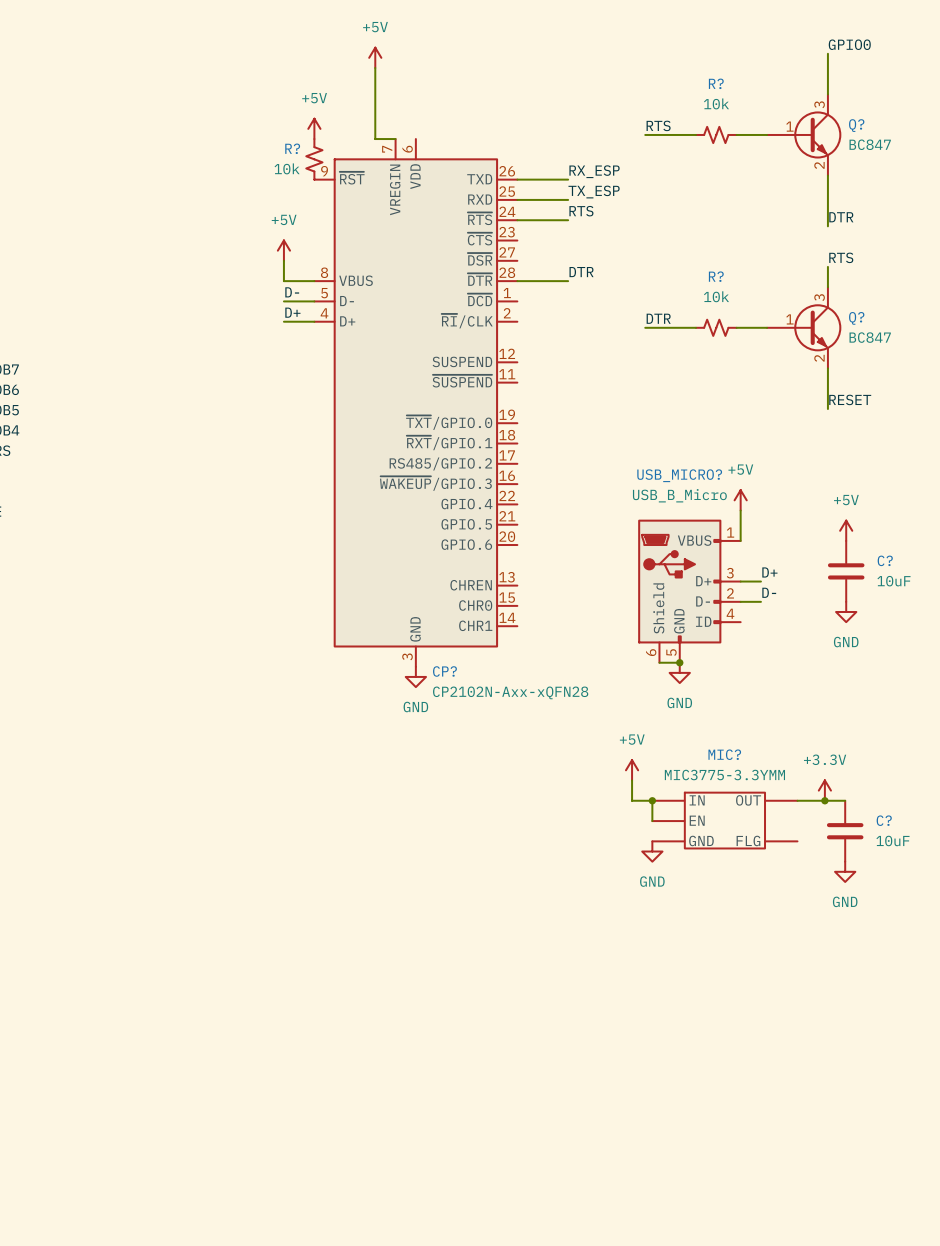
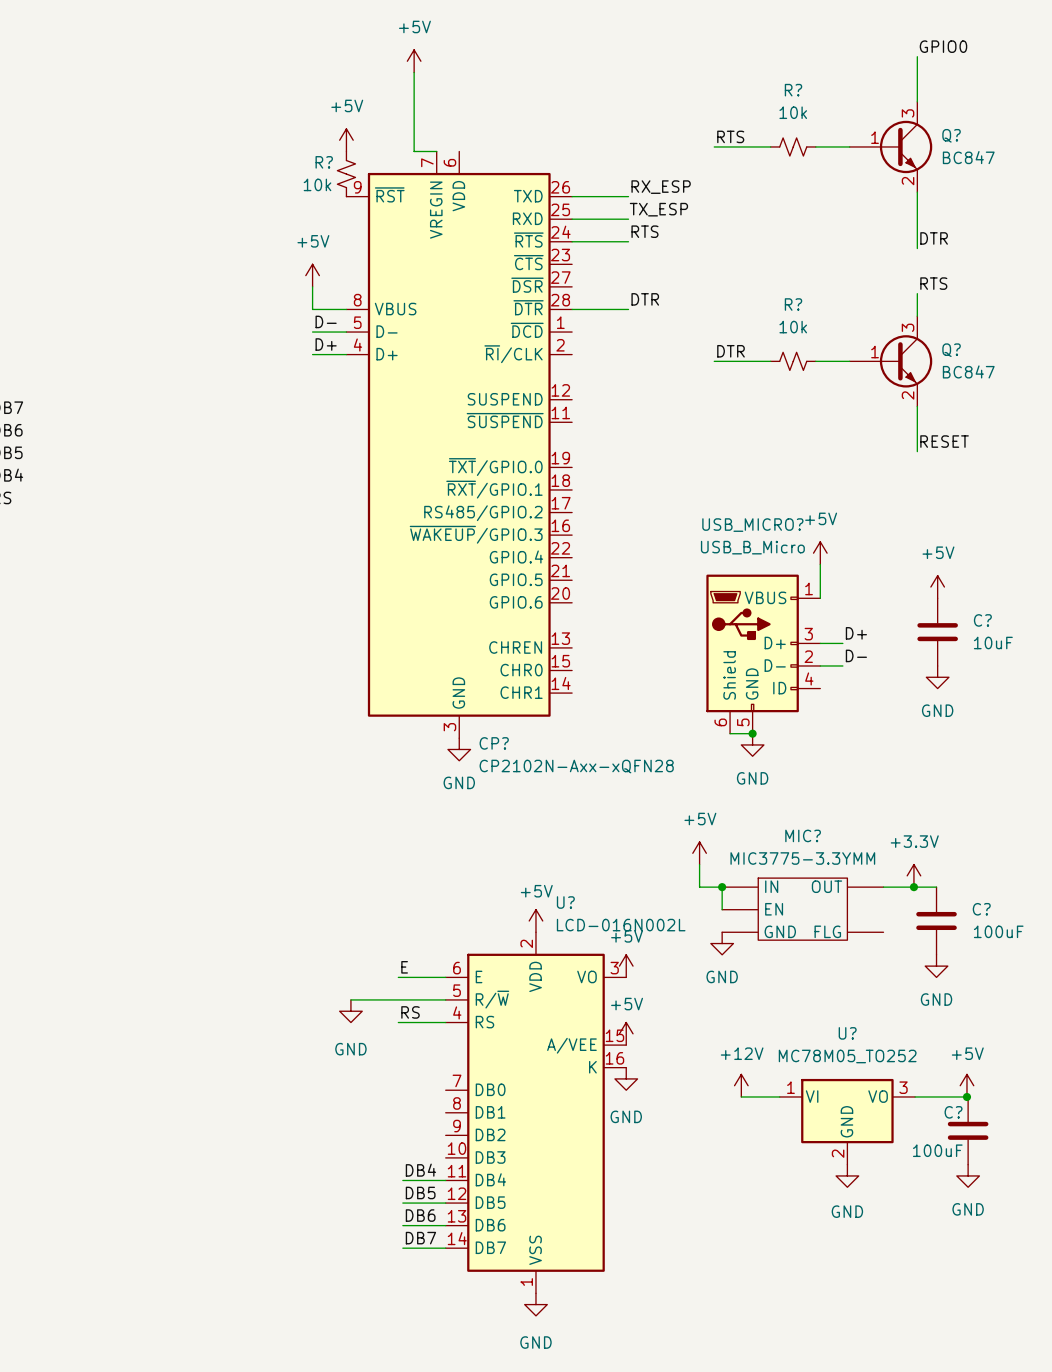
power symbol: none -> +5V (535, 920)
C? value: 10uF (892, 840) -> 100uF (998, 931)
power symbol: none -> +5V (626, 966)
label: none -> E (404, 967)
wire: none -> (398, 977) (445, 977)
wire: none -> (350, 999) (445, 999)
power symbol: none -> GND (350, 1011)
label: none -> RS (410, 1012)
wire: none -> (398, 1022) (445, 1022)
power symbol: none -> +5V (626, 1033)
power symbol: none -> GND (626, 1078)
power symbol: none -> +12V (741, 1085)
power symbol: none -> +5V (966, 1085)
wire: none -> (741, 1096) (779, 1096)
wire: none -> (915, 1096) (968, 1096)
junction: none -> (966, 1096)
U?: none -> LCD-016N002L (535, 1112)
U?: none -> MC78M05_TO252 (847, 1121)
C?: none -> 100uF (968, 1130)
label: none -> DB4 (420, 1170)
power symbol: none -> GND (847, 1175)
power symbol: none -> GND (968, 1175)
wire: none -> (402, 1180) (445, 1180)
label: none -> DB5 (420, 1192)
wire: none -> (402, 1203) (445, 1203)
label: none -> DB6 (420, 1215)
wire: none -> (402, 1225) (445, 1225)
label: none -> DB7 (420, 1238)
wire: none -> (402, 1248) (445, 1248)
power symbol: none -> GND (535, 1304)

